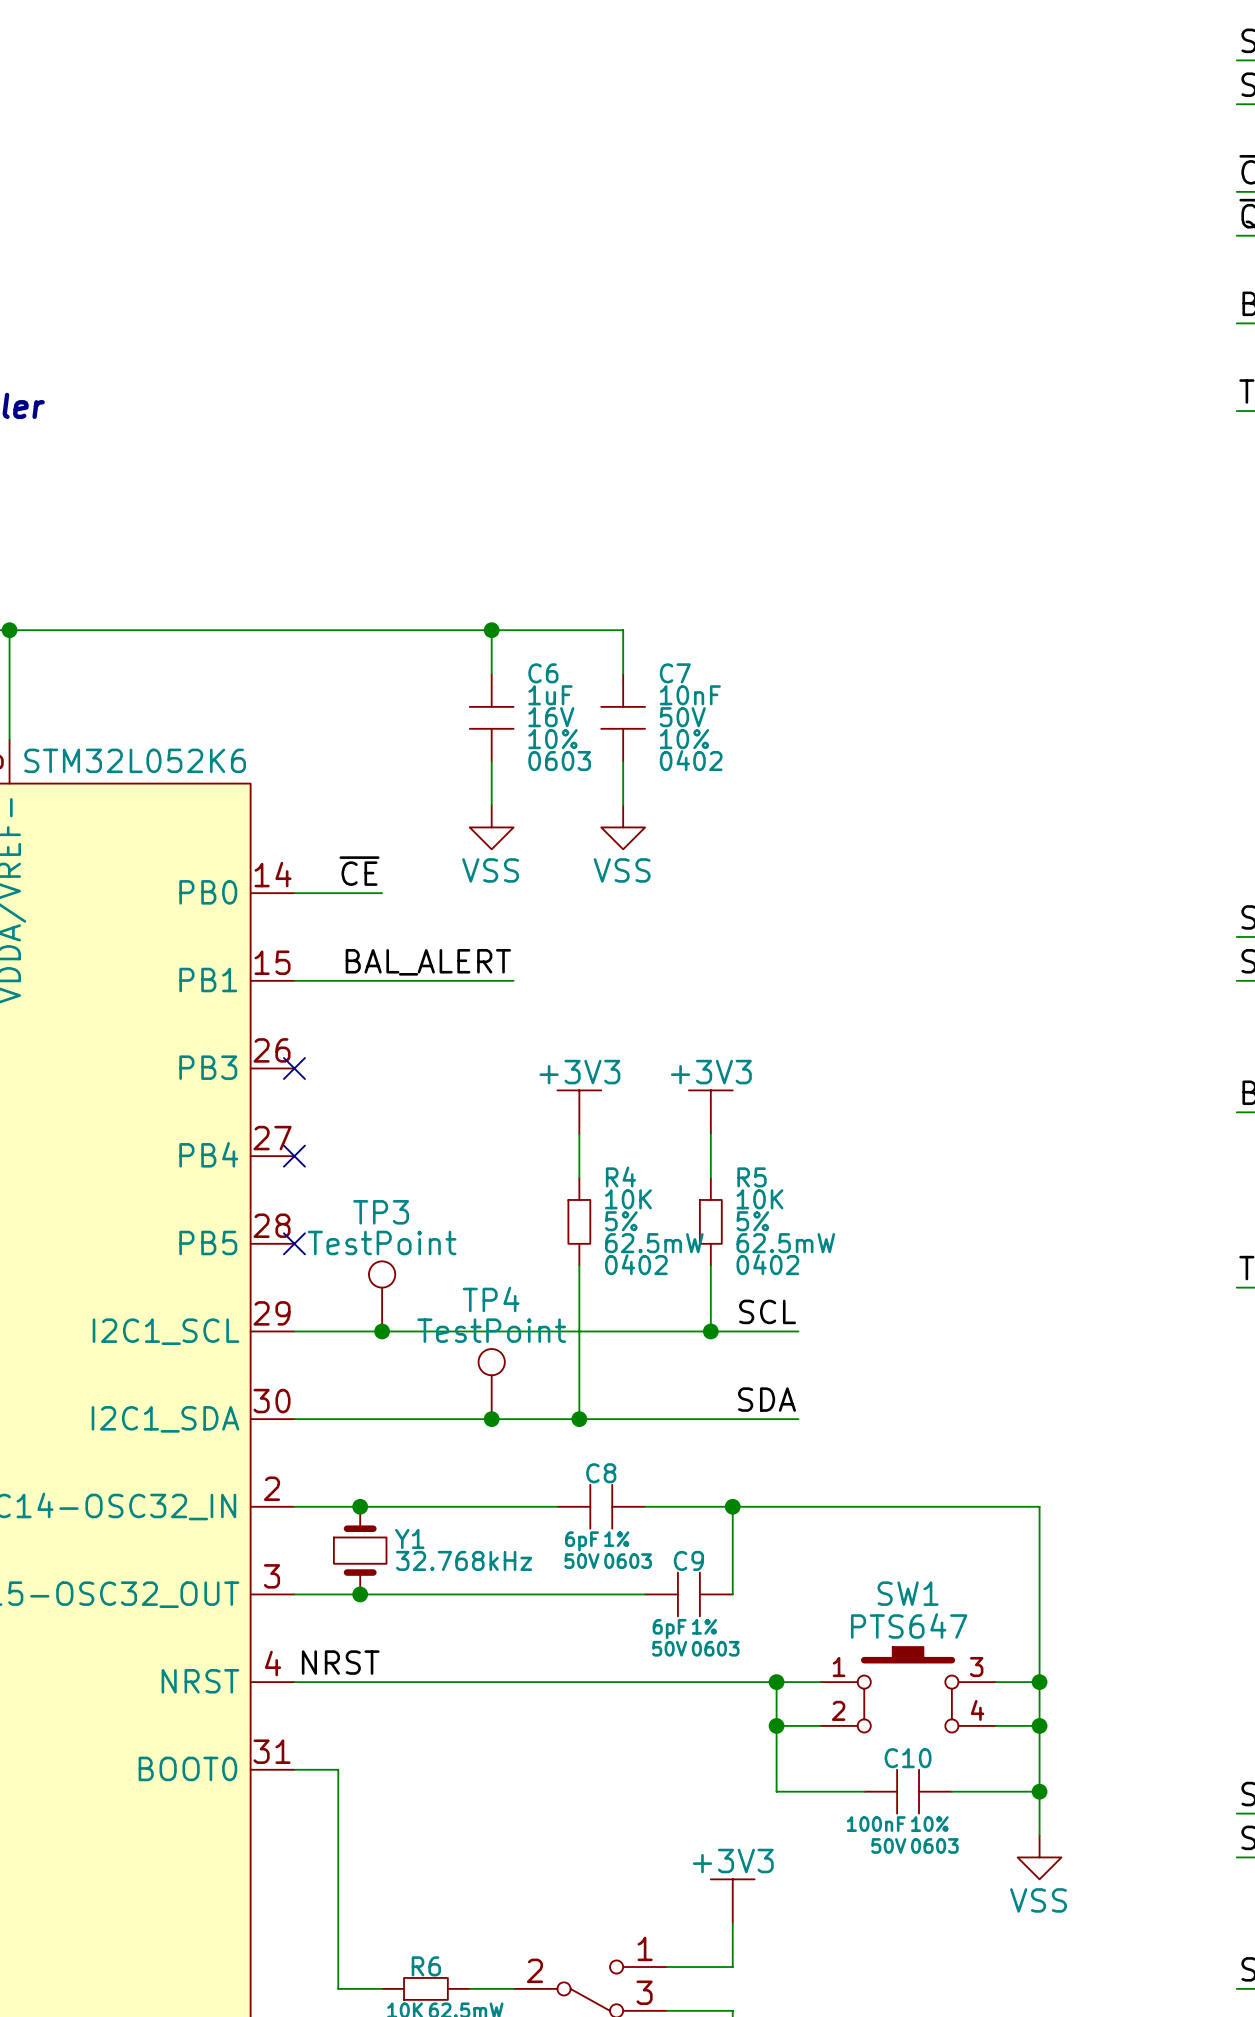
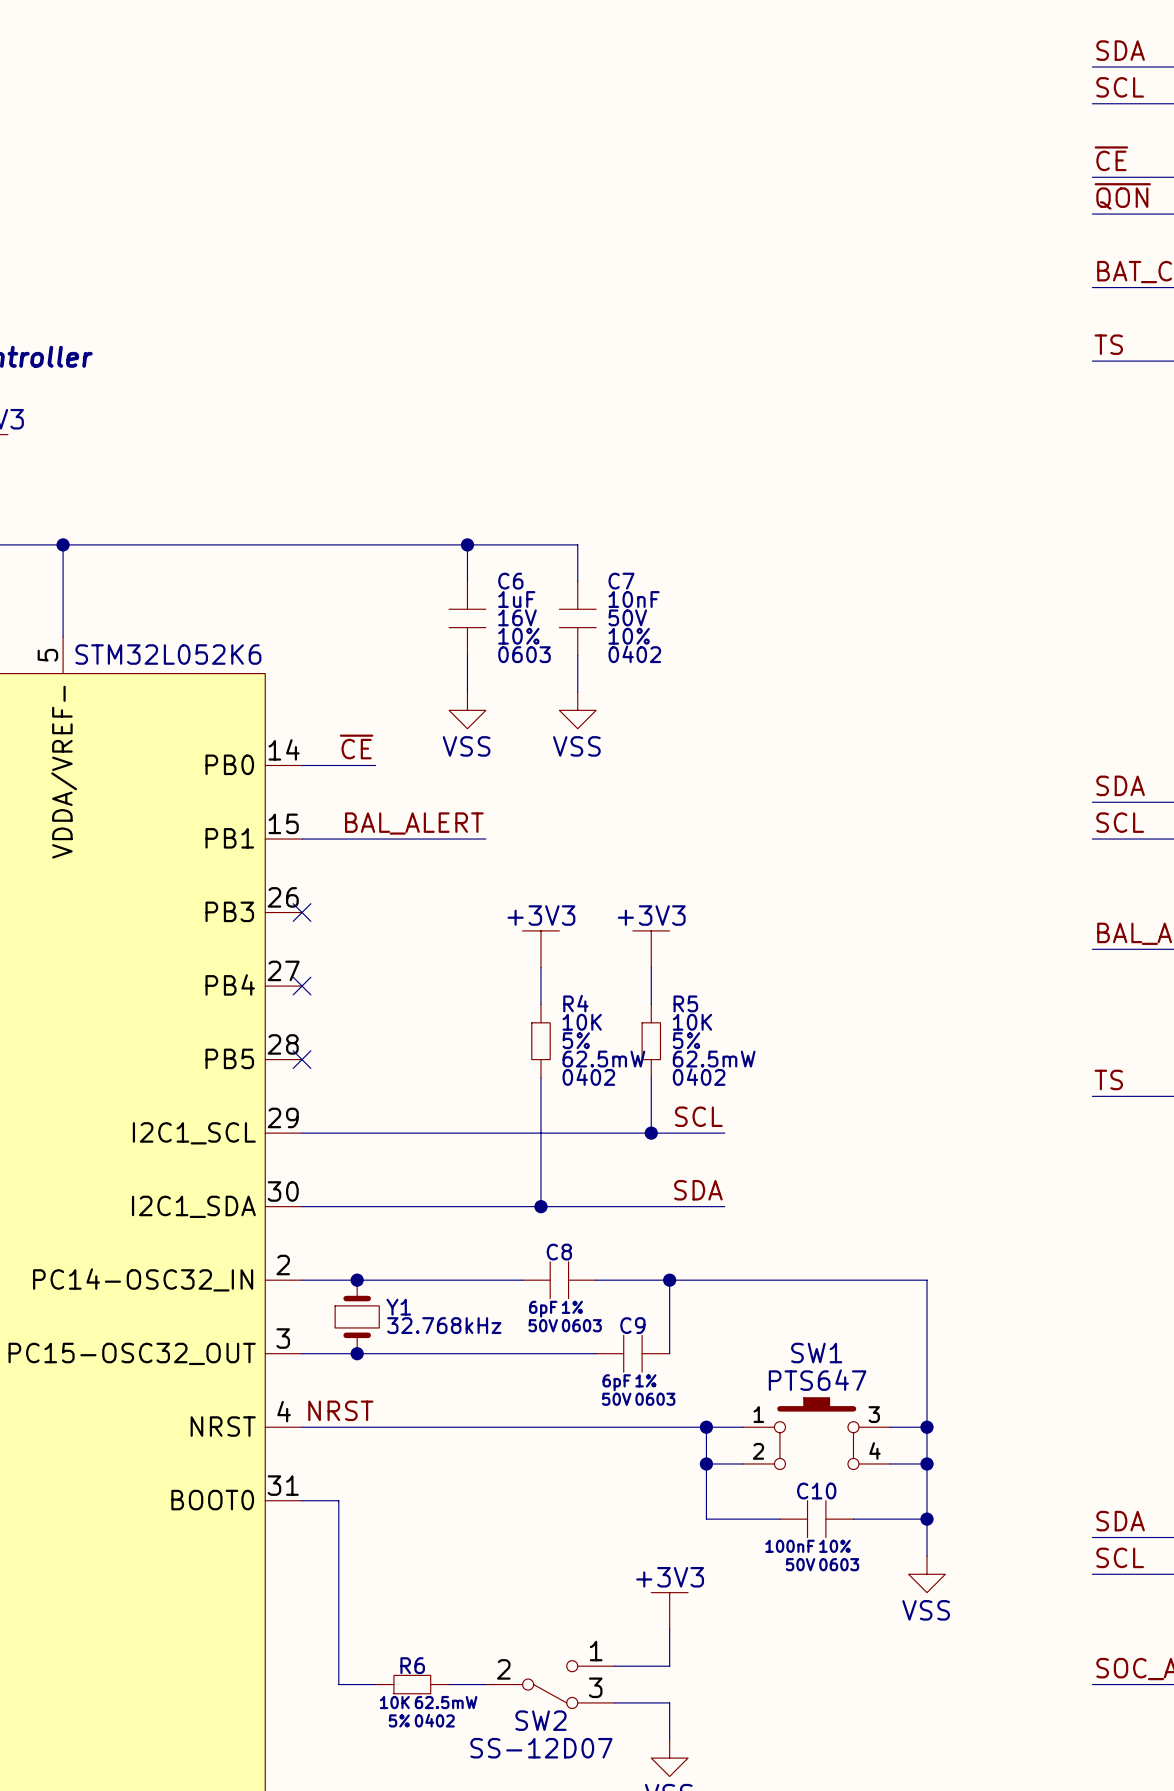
TP3: TestPoint (382, 1296) -> none
junction: (382, 1331) -> none
TP4: TestPoint (491, 1384) -> none
junction: (491, 1419) -> none

